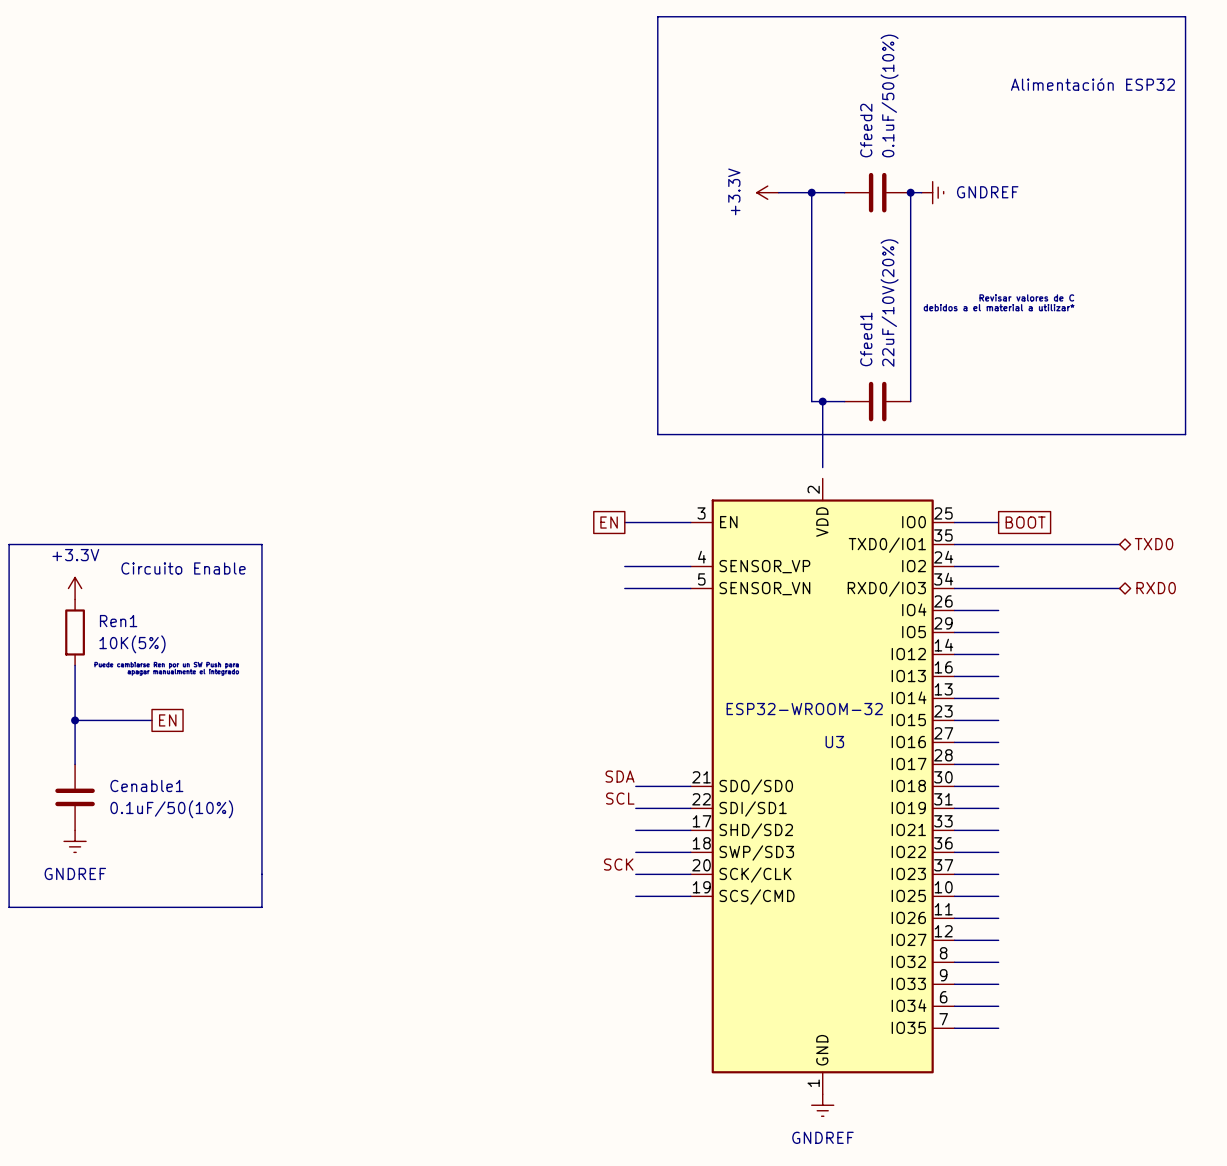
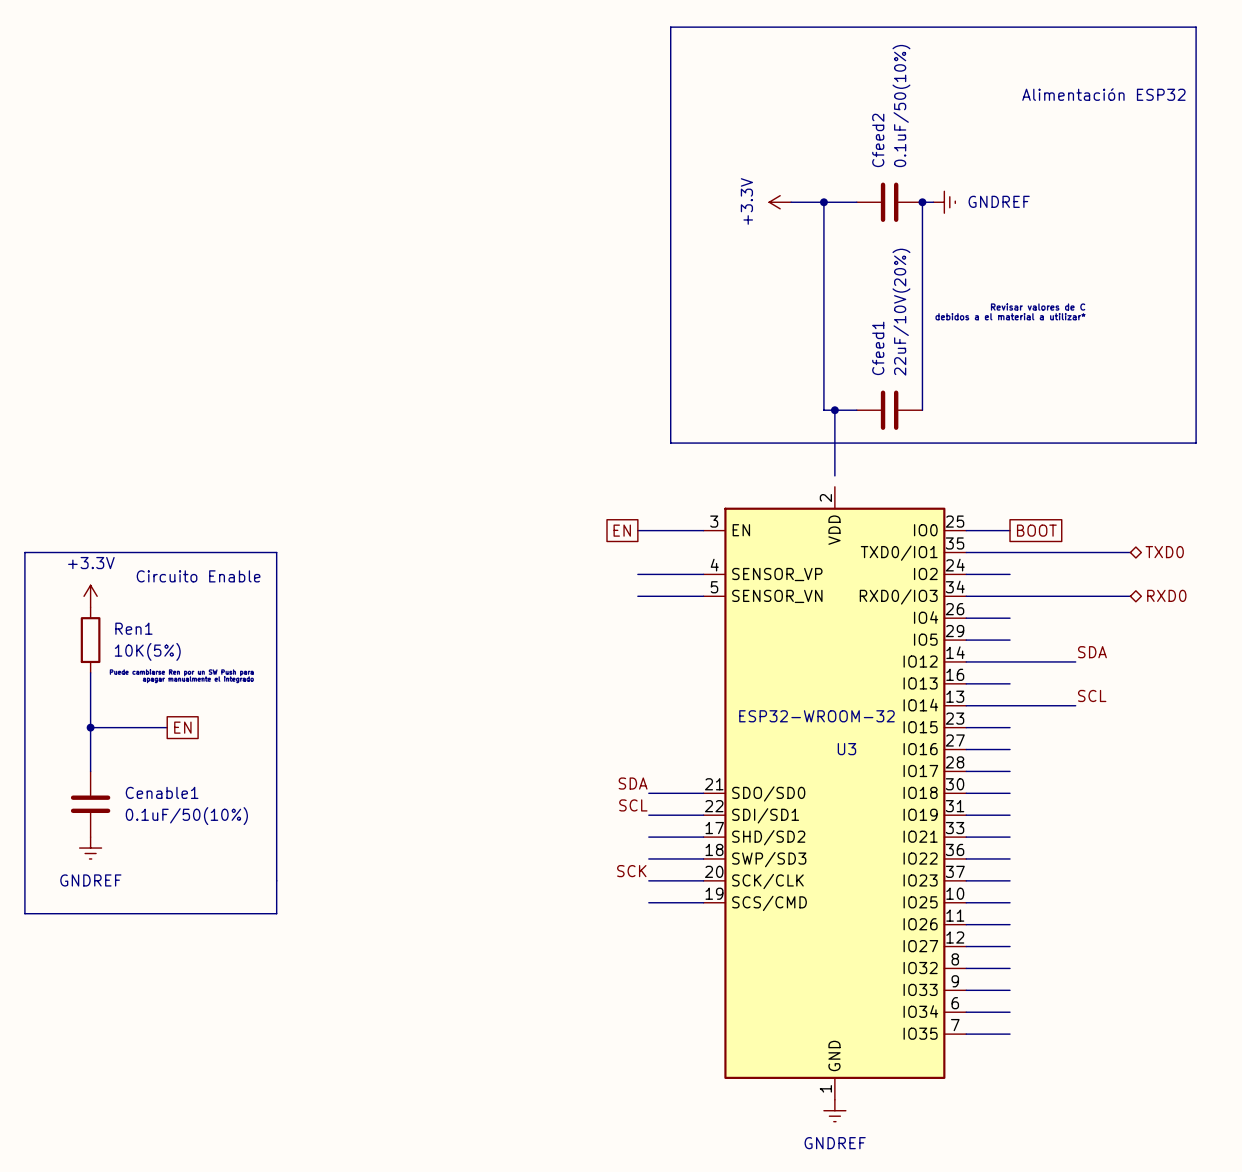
label: none -> SDA (1092, 652)
wire: none -> (1010, 661) (1075, 661)
label: none -> SCL (1092, 695)
wire: none -> (1010, 705) (1075, 705)

